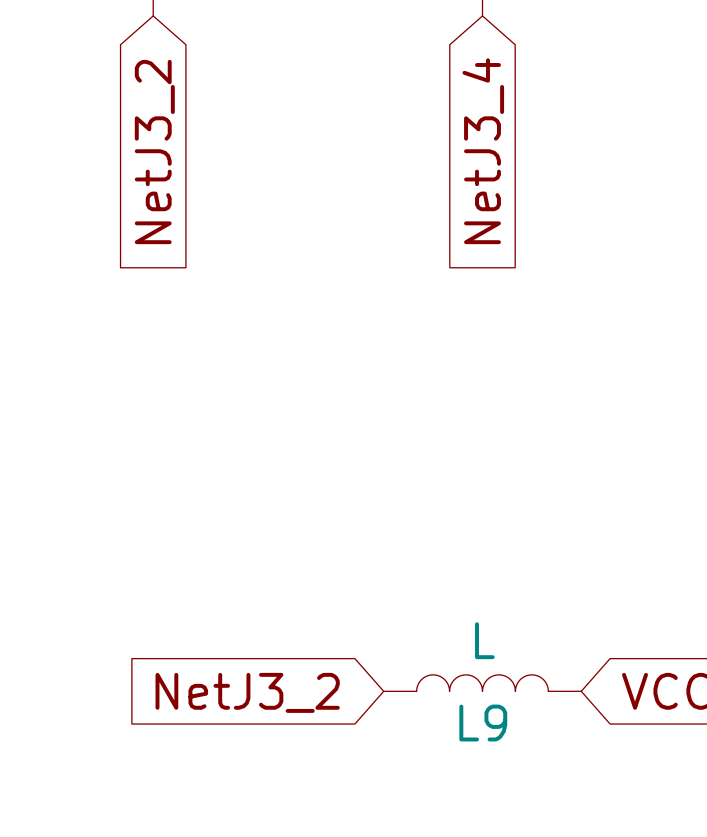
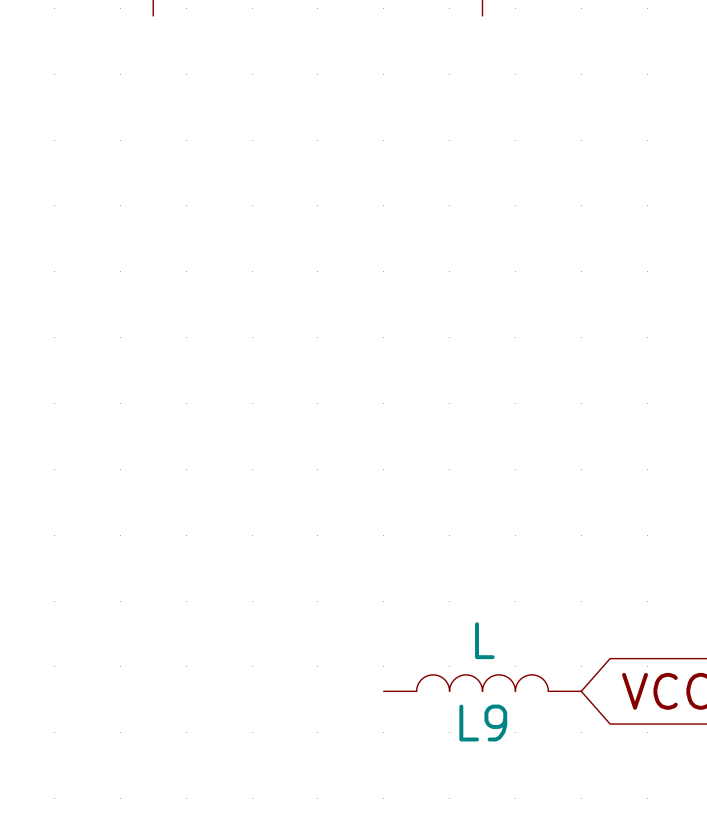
global label: NetJ3_4 (483, 151) -> none
global label: NetJ3_2 (154, 152) -> none
global label: NetJ3_2 (247, 692) -> none

